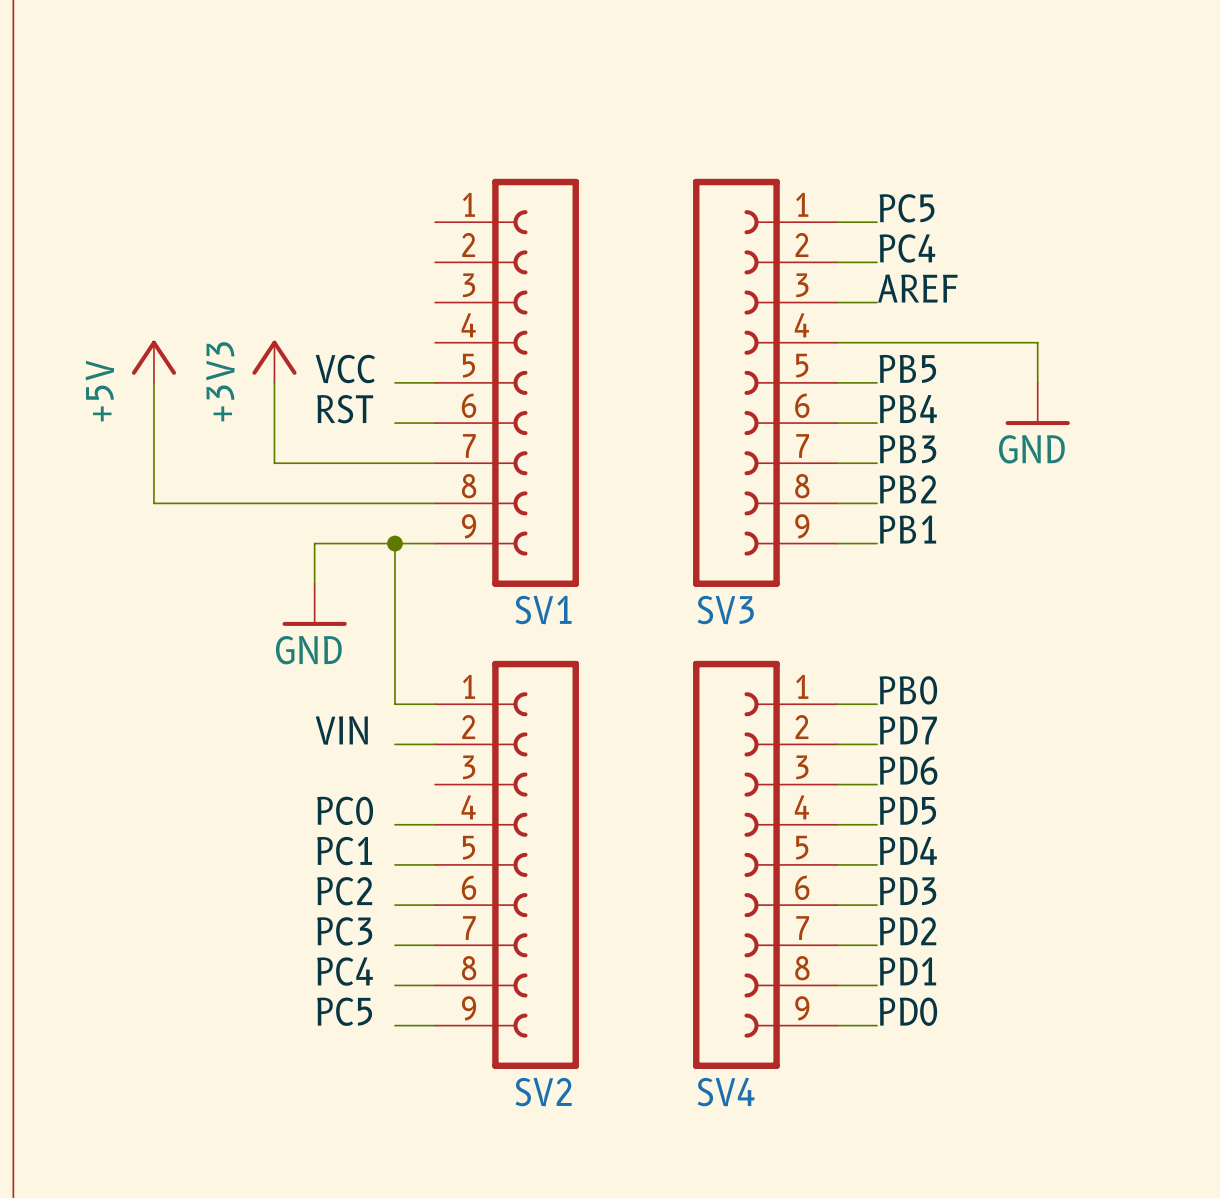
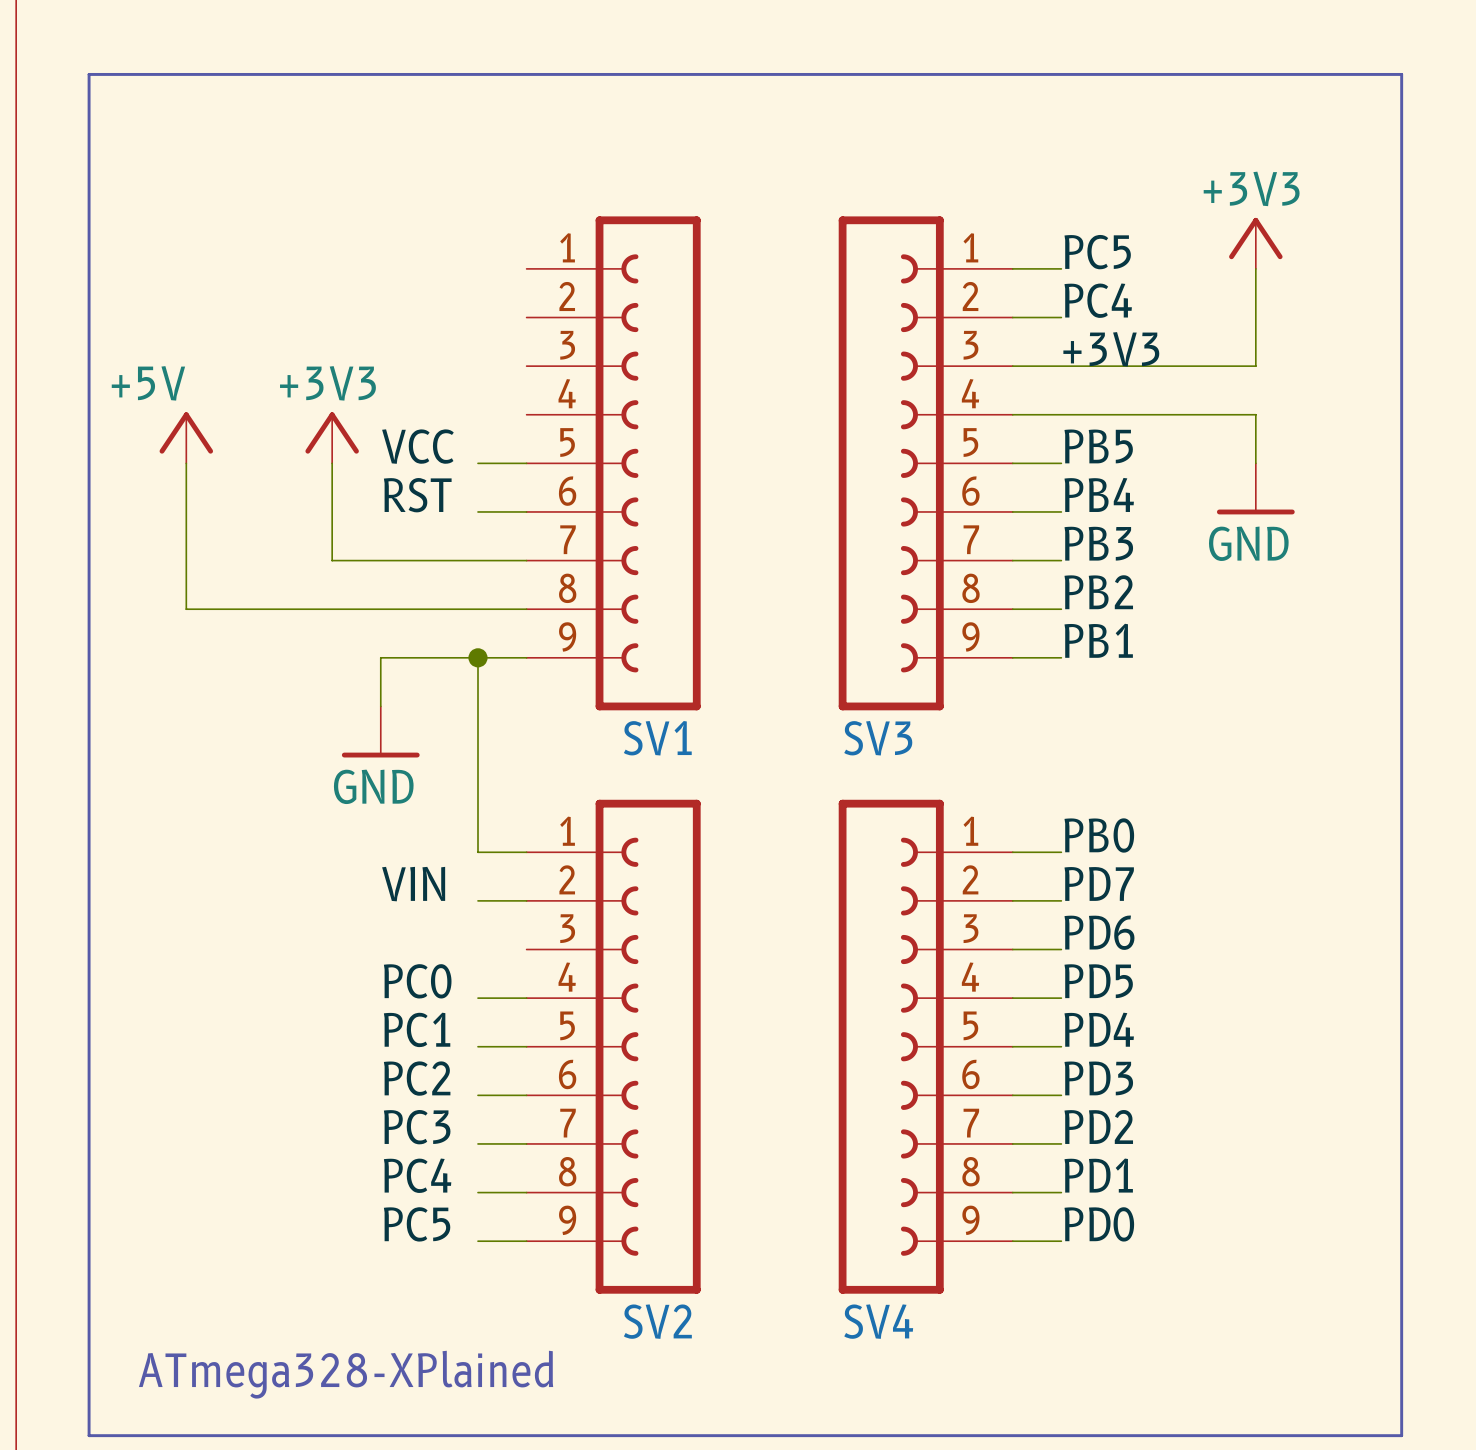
line: none -> (89, 74) (89, 1435) (1401, 1435) (1401, 74) (89, 74)
power symbol: none -> +3V3 (1255, 243)
wire: none -> (1255, 268) (1255, 366) (1061, 366)
label: AREF (917, 288) -> +3V3 (1111, 349)
power symbol text rotation: 0° (220, 381) -> 90° clockwise (327, 383)
power symbol text rotation: 0° (99, 391) -> 90° clockwise (148, 383)
text: none -> ATmega328-XPlained (346, 1374)

